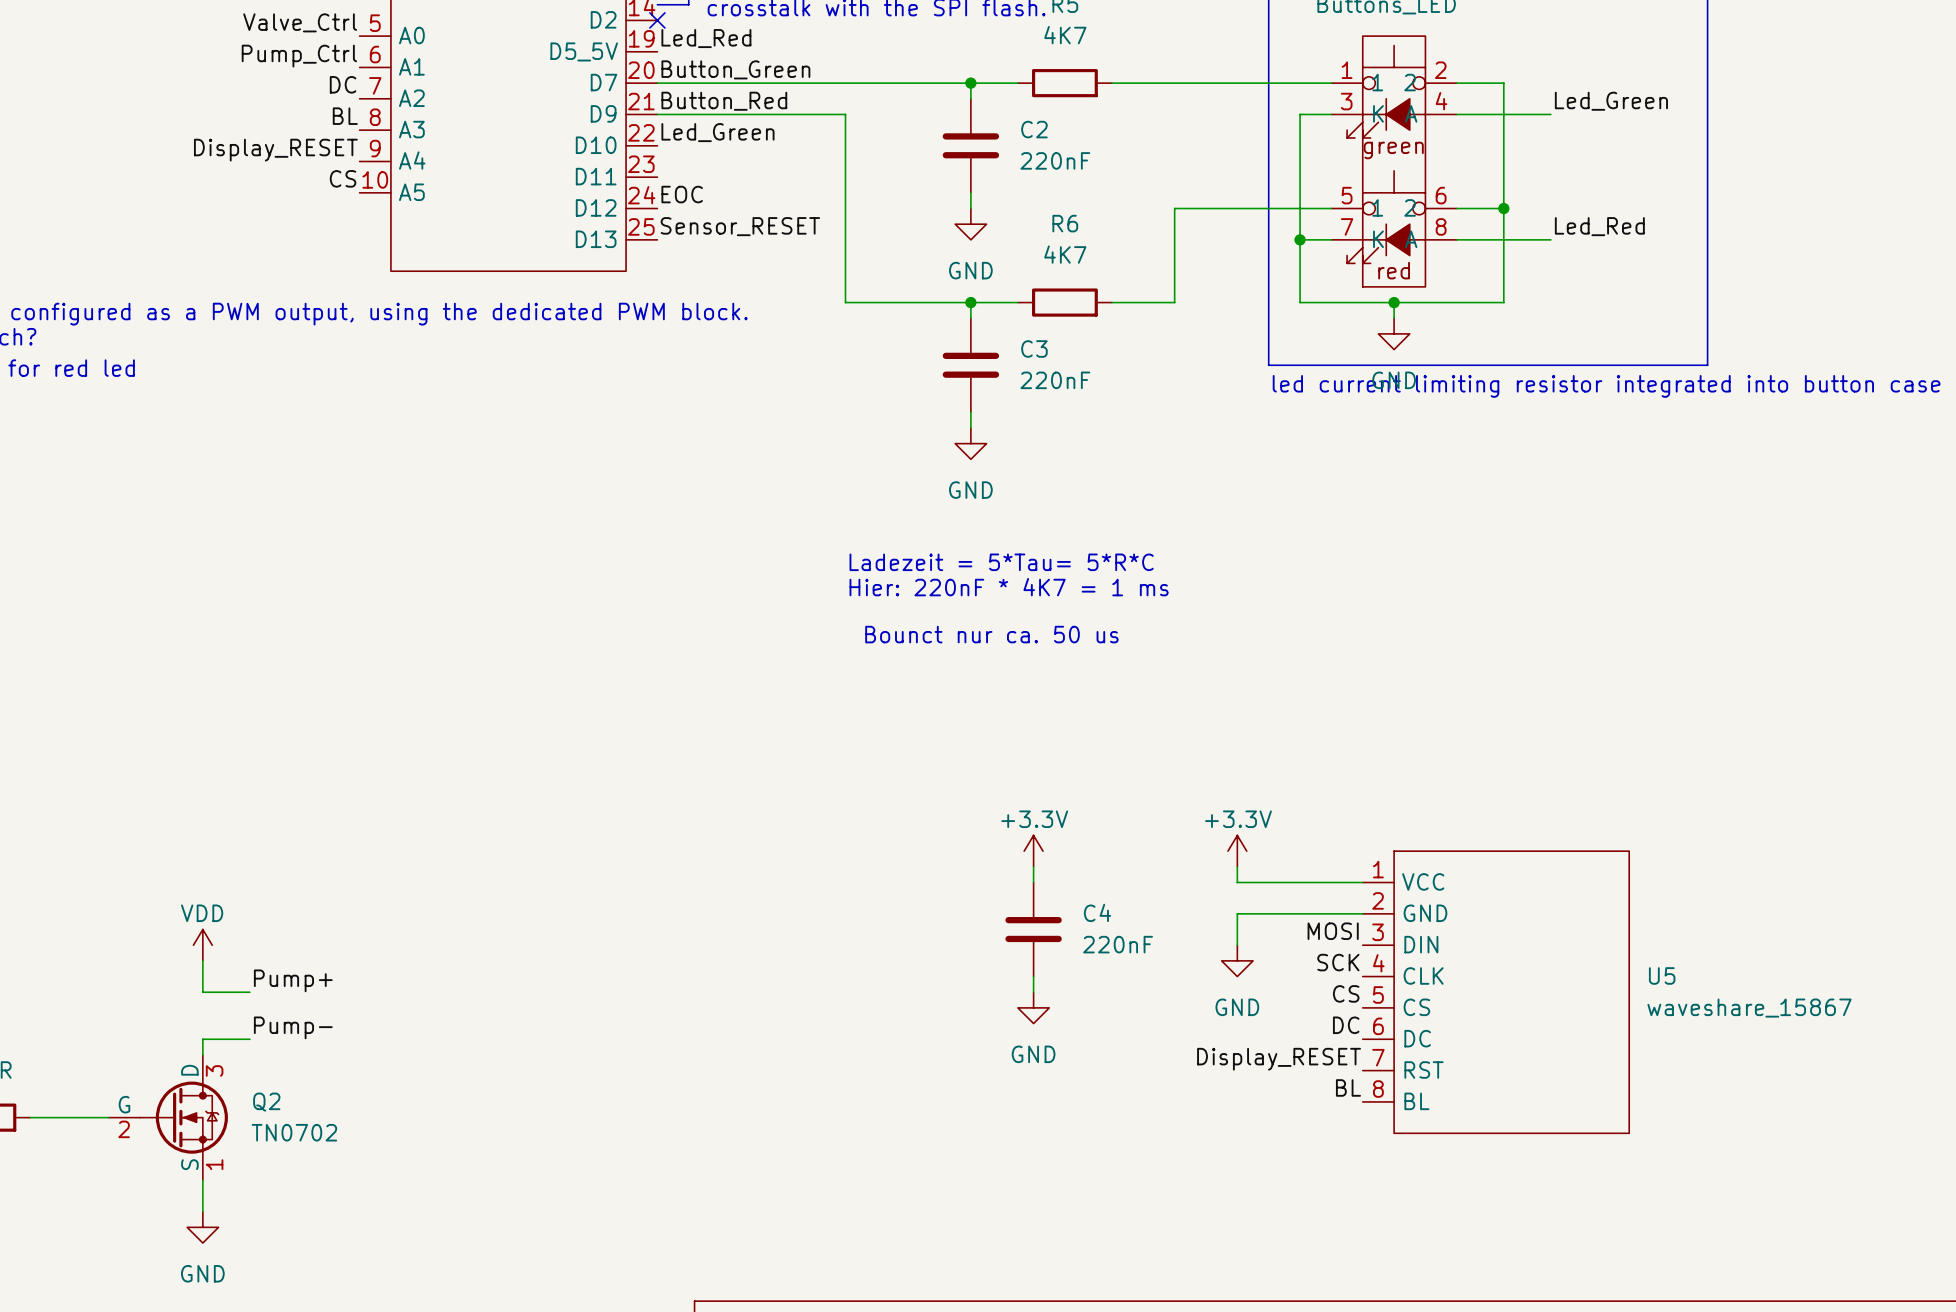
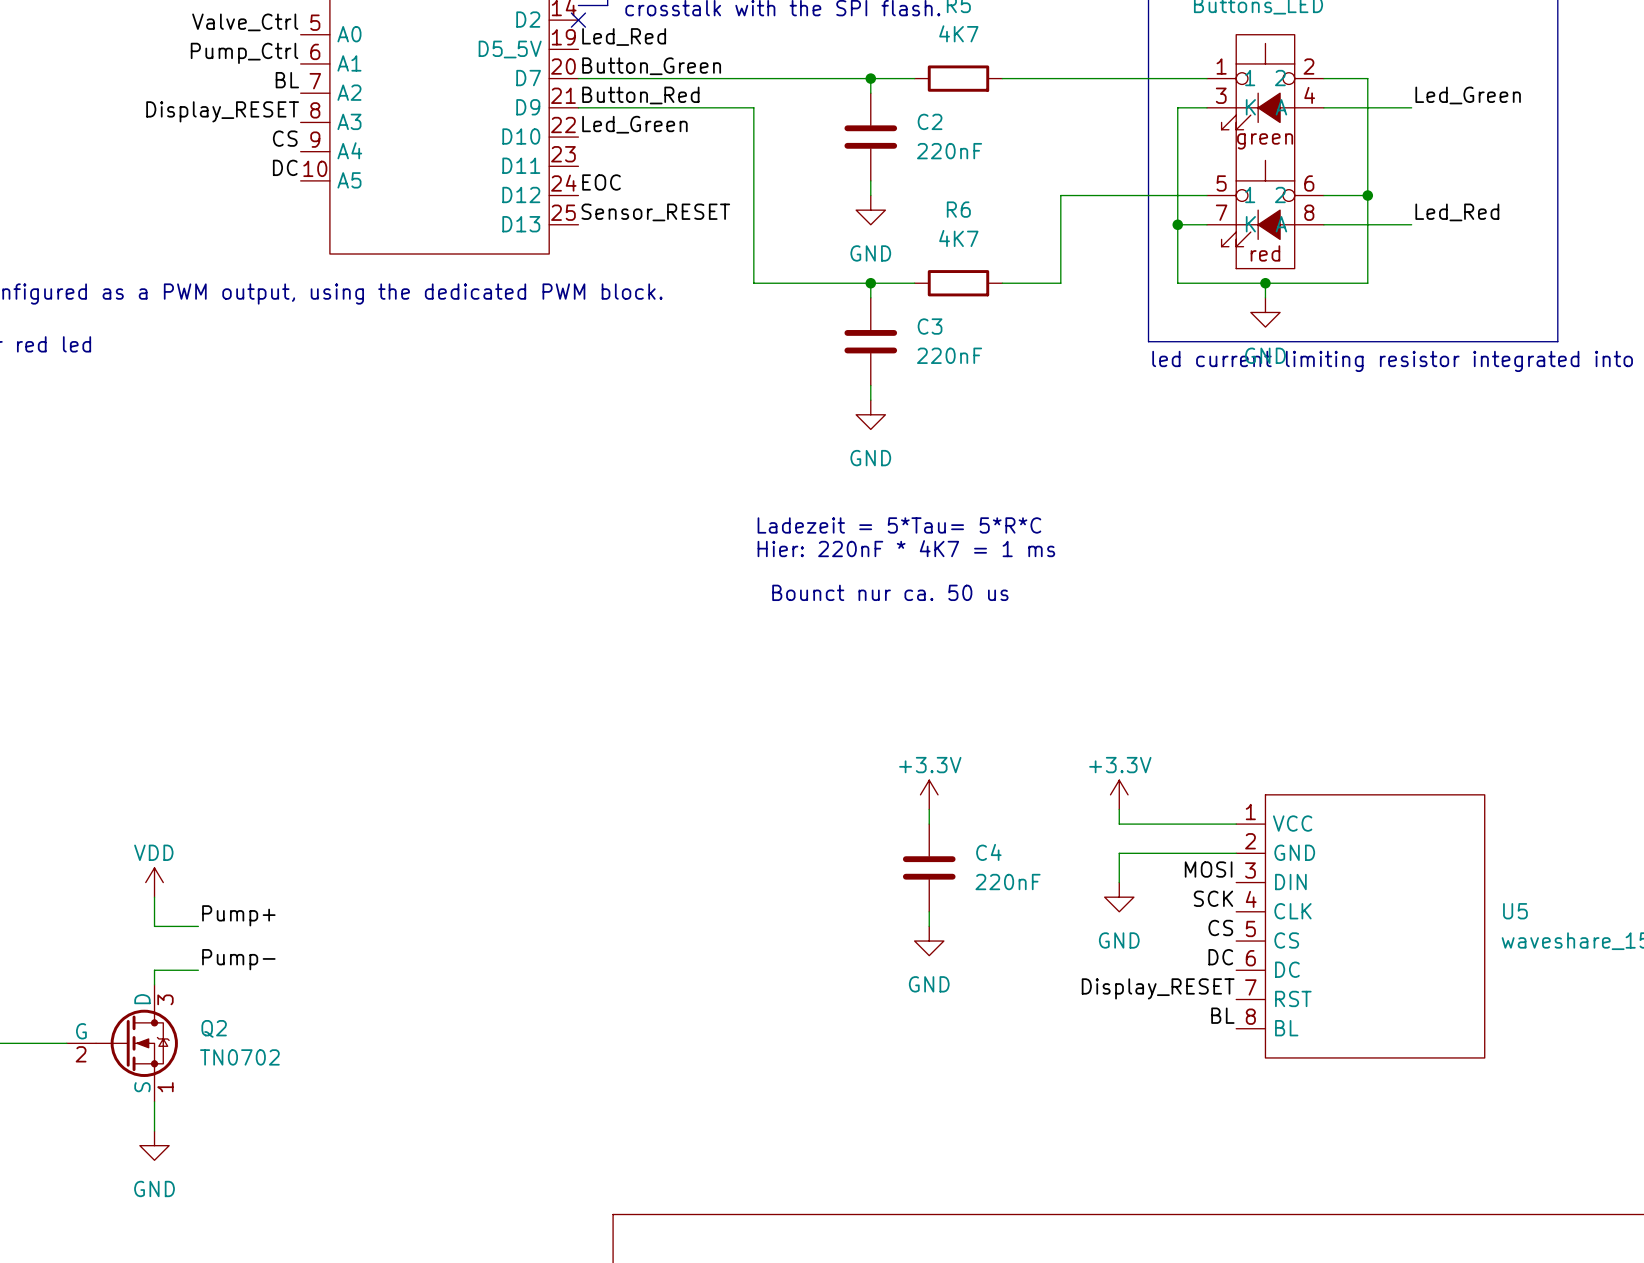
label: DC (343, 84) -> BL (287, 80)
label: BL (345, 116) -> Display_RESET (222, 111)
label: Display_RESET (275, 150) -> CS (285, 138)
label: CS (343, 178) -> DC (285, 167)

